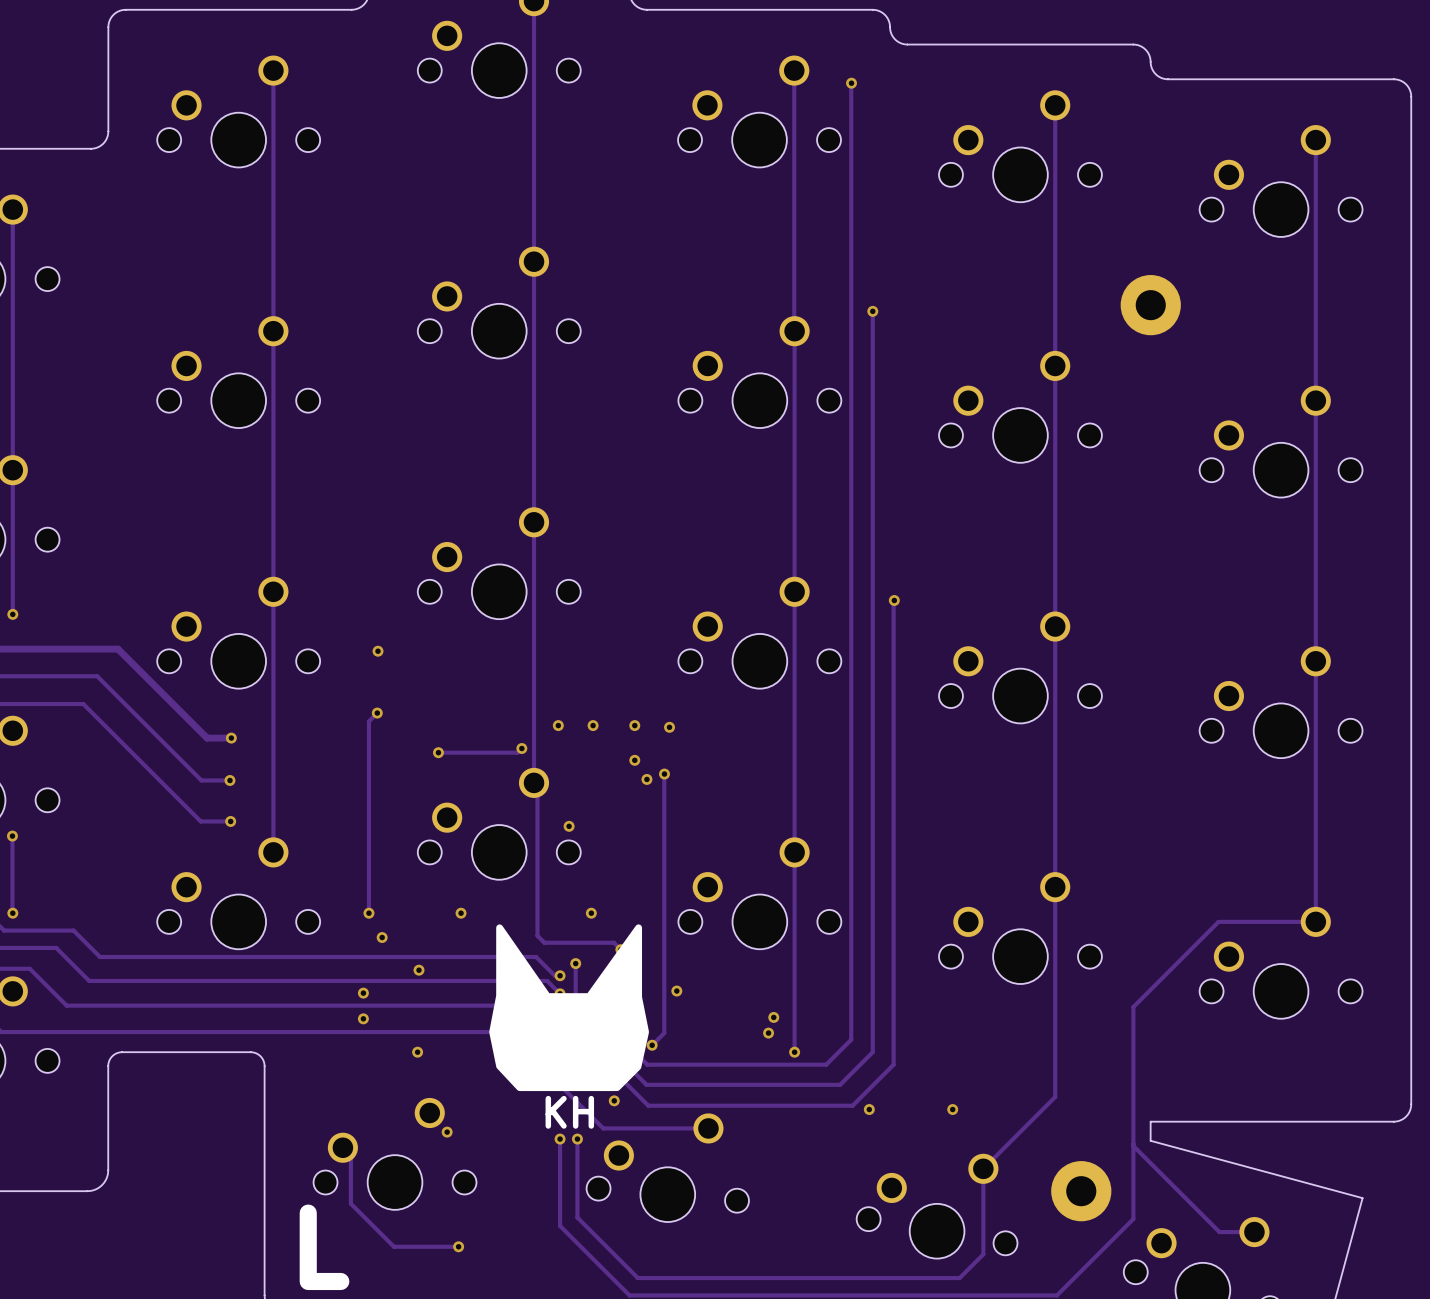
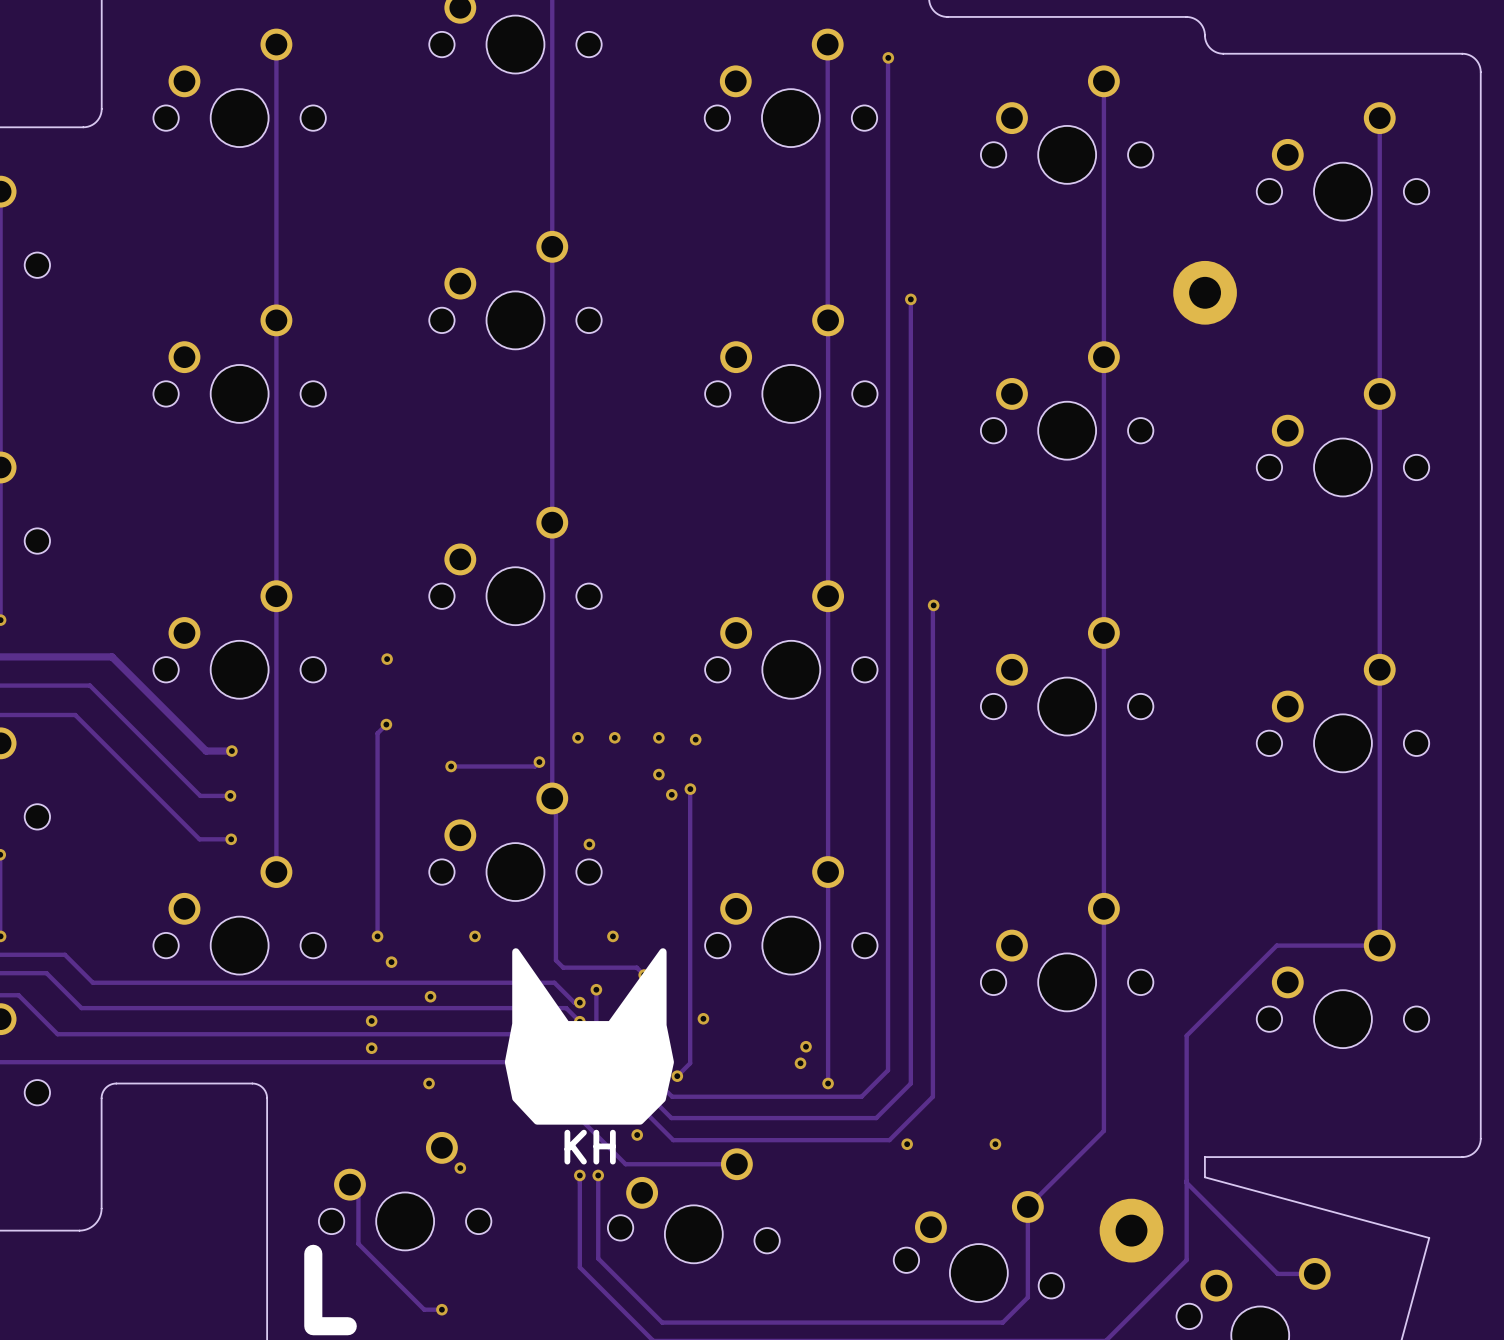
track: (393, 1246) (458, 1246) -> (404, 1289) (424, 1309) (441, 1309)
via position: (458, 1246) -> (441, 1309)

